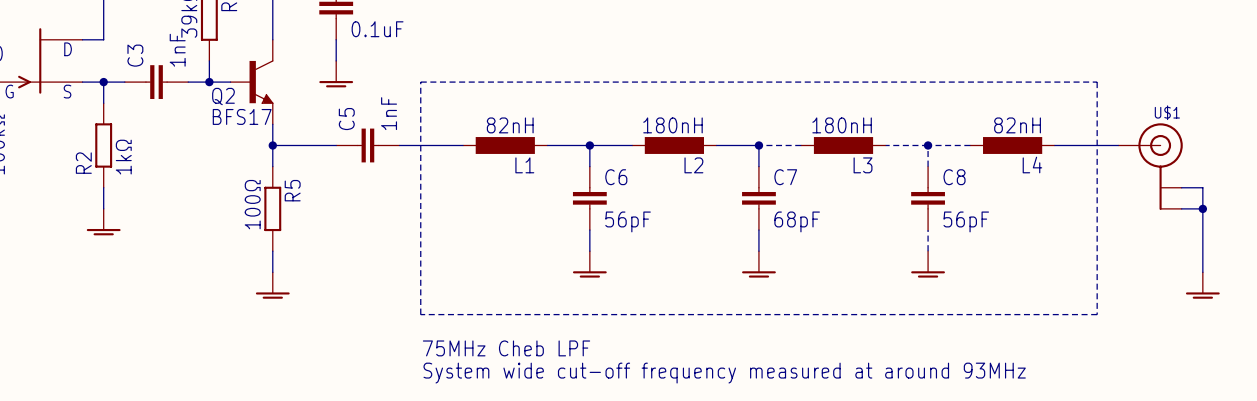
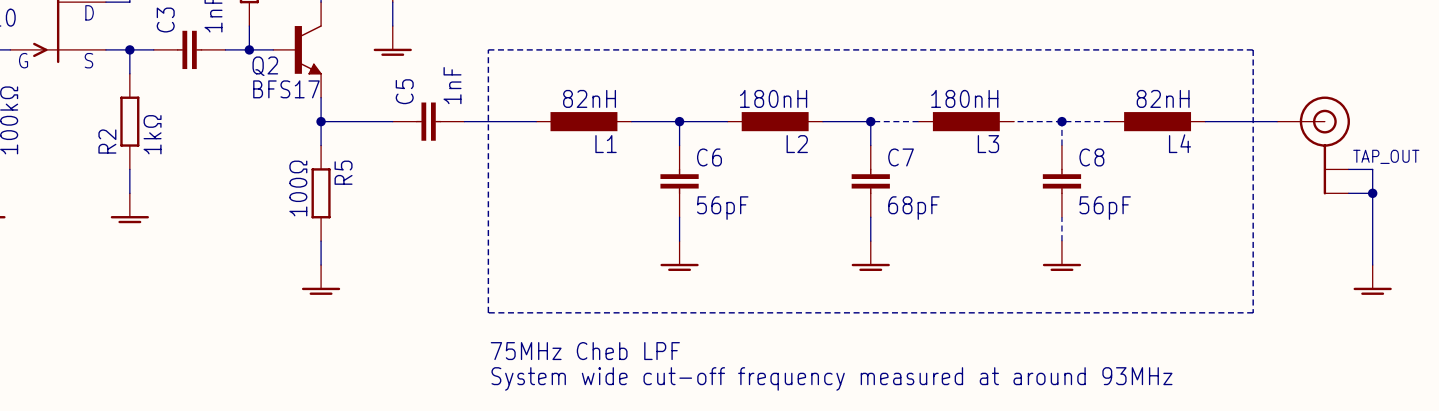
U$1 name: U$1 (1167, 112) -> TAP_OUT (1386, 156)

